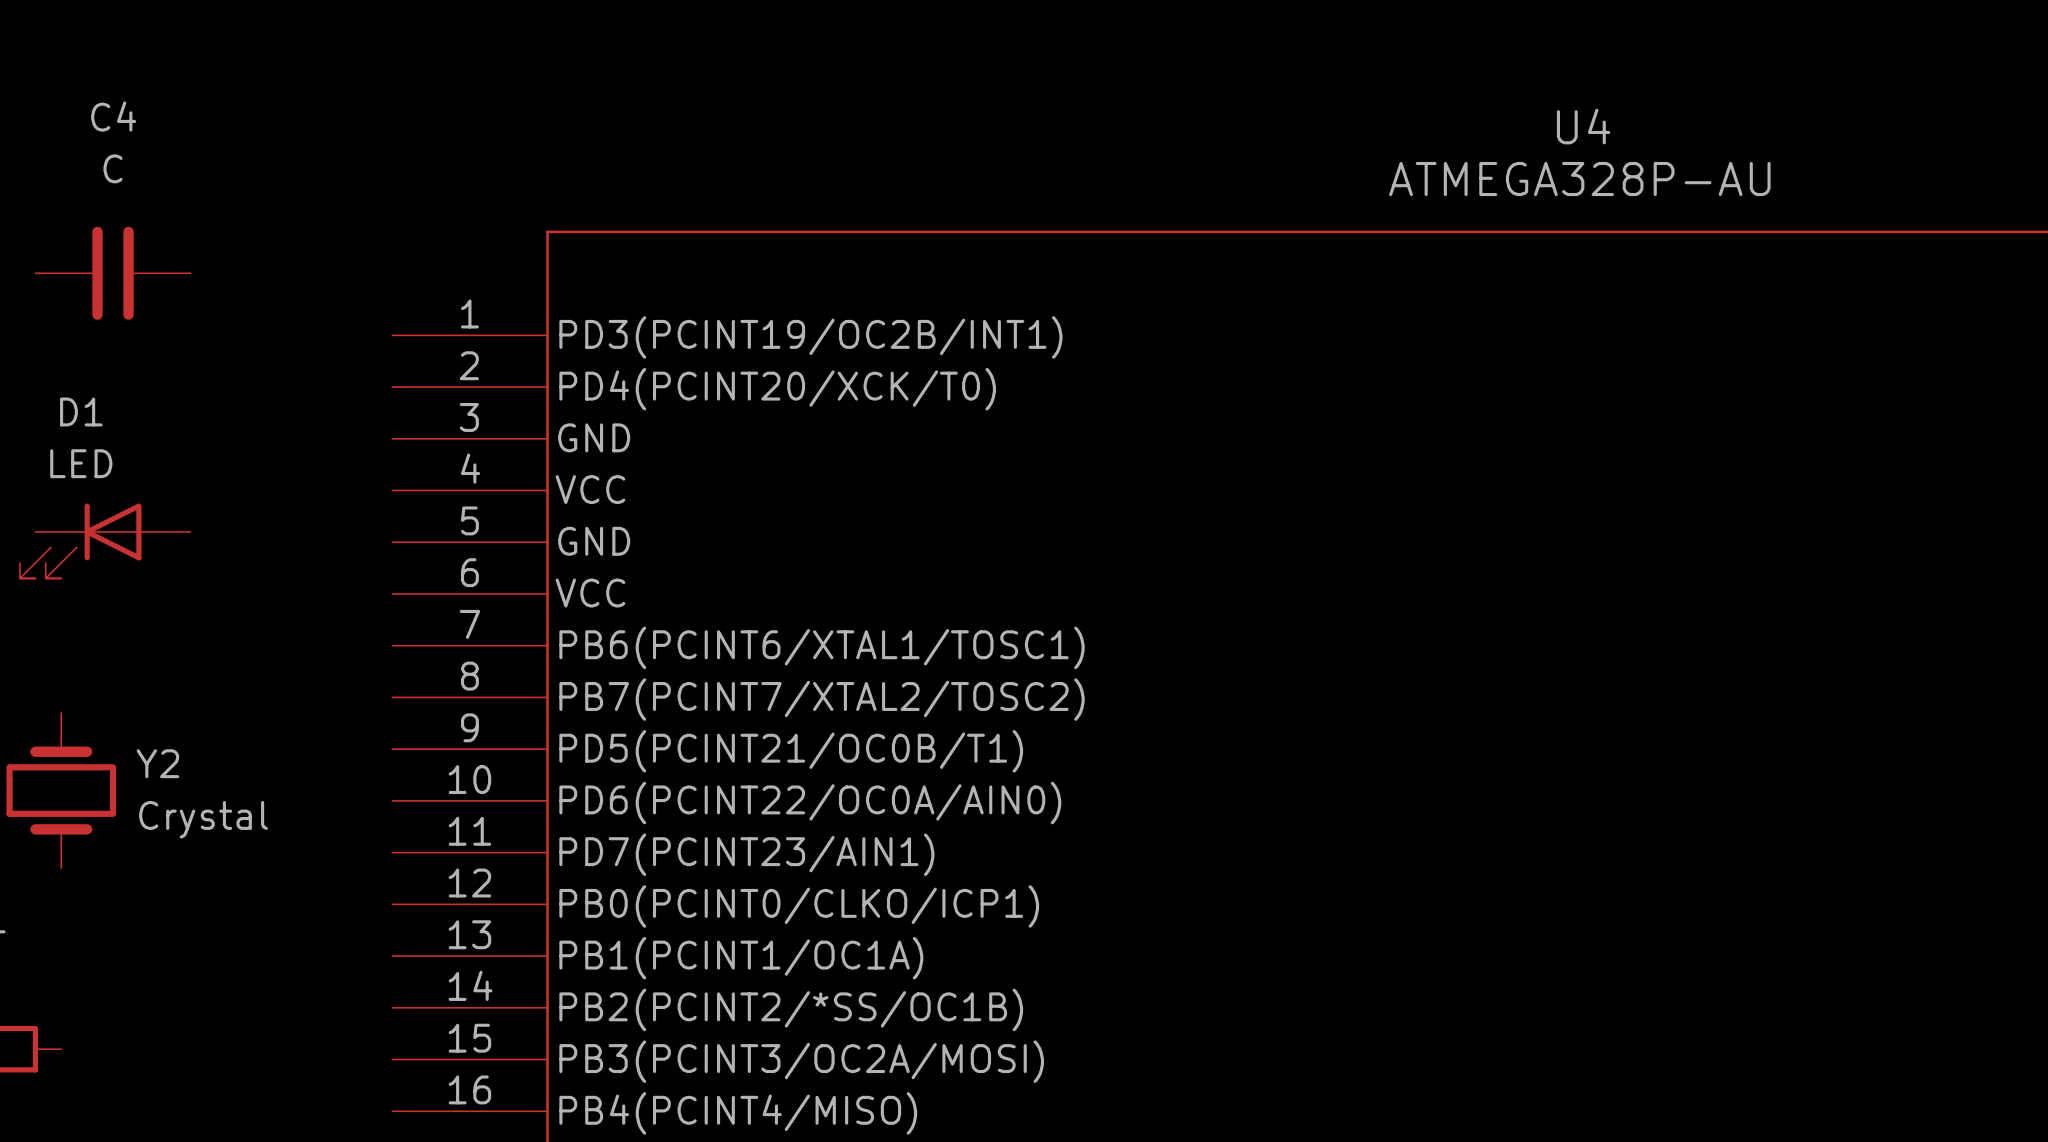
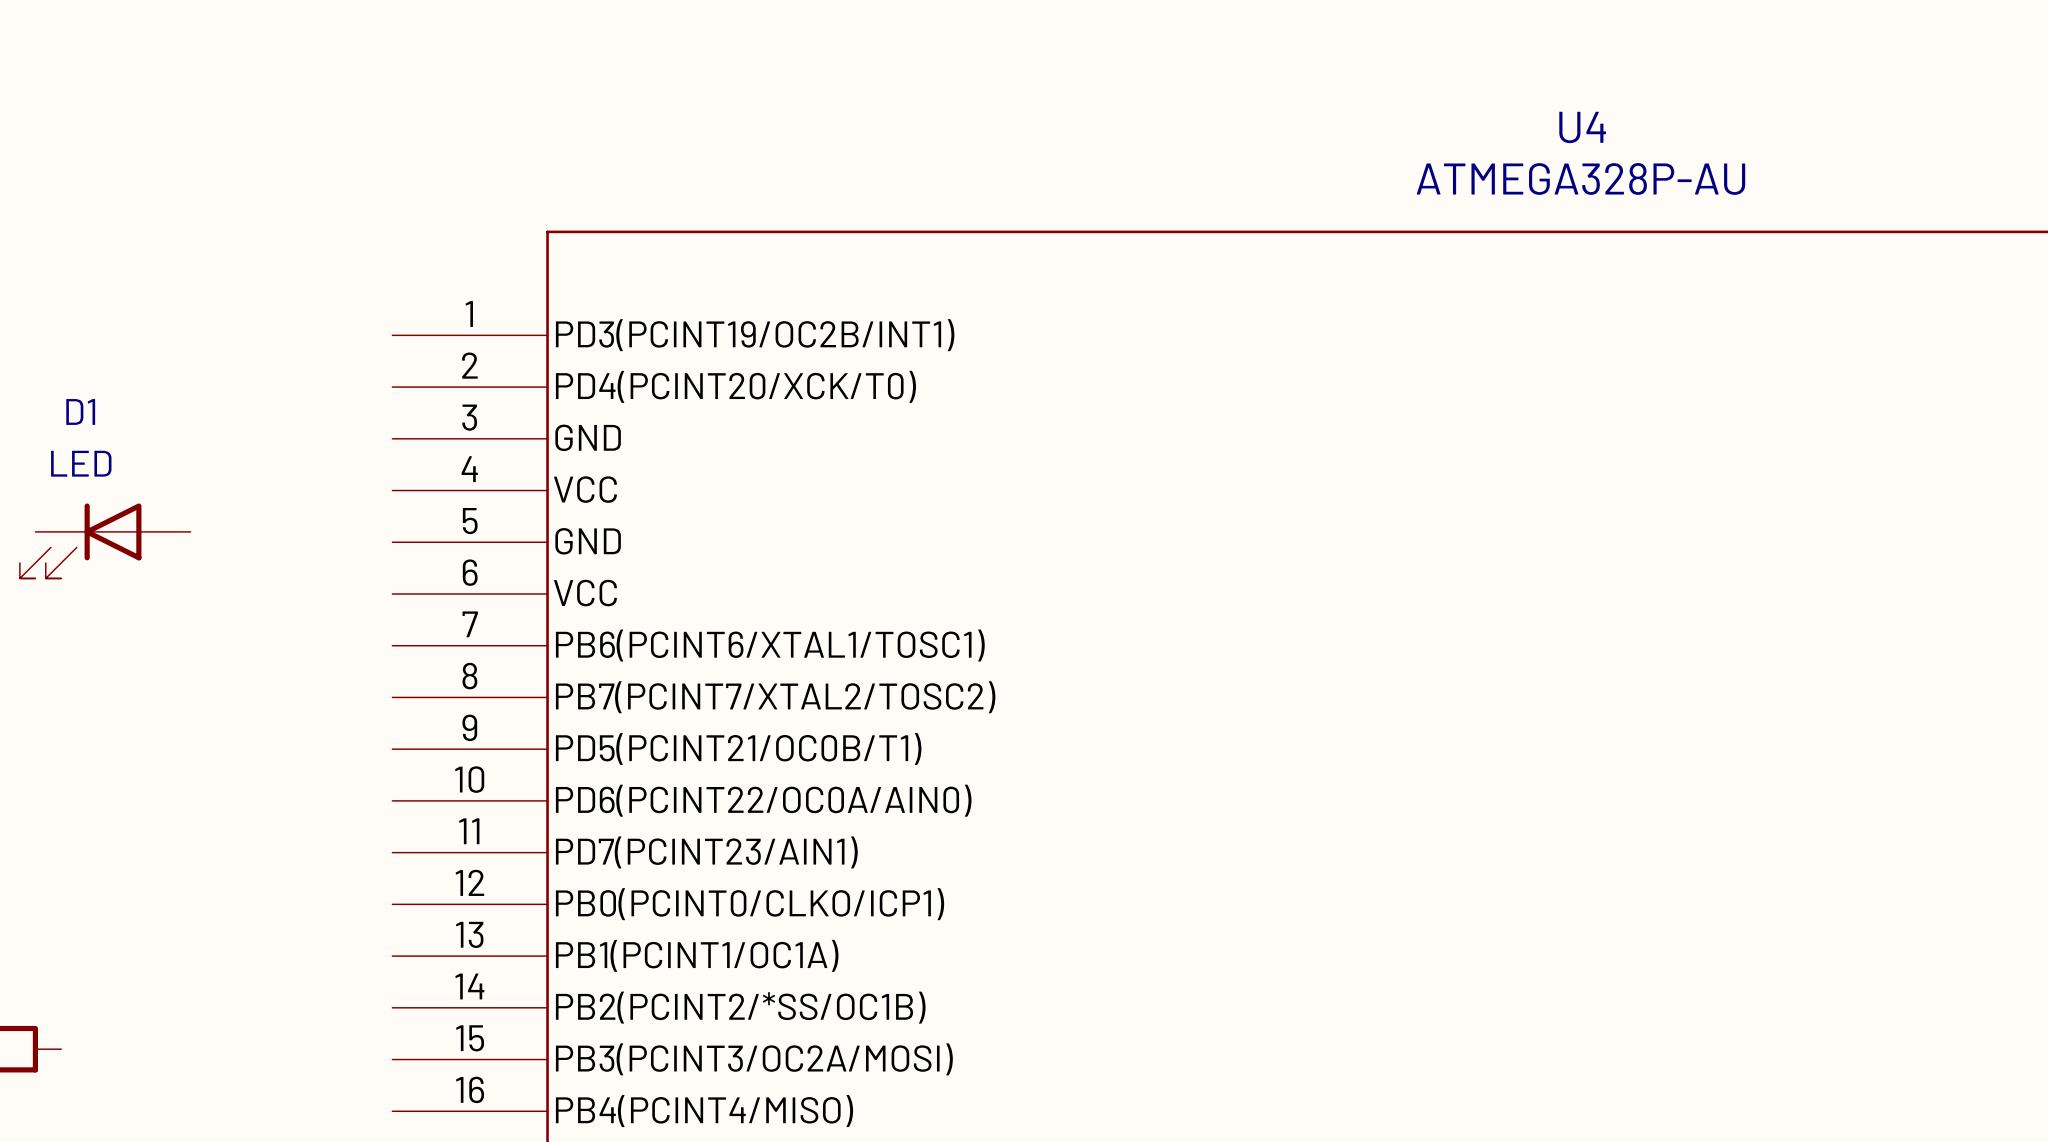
C4: C (113, 273) -> none
Y2: Crystal (61, 790) -> none

